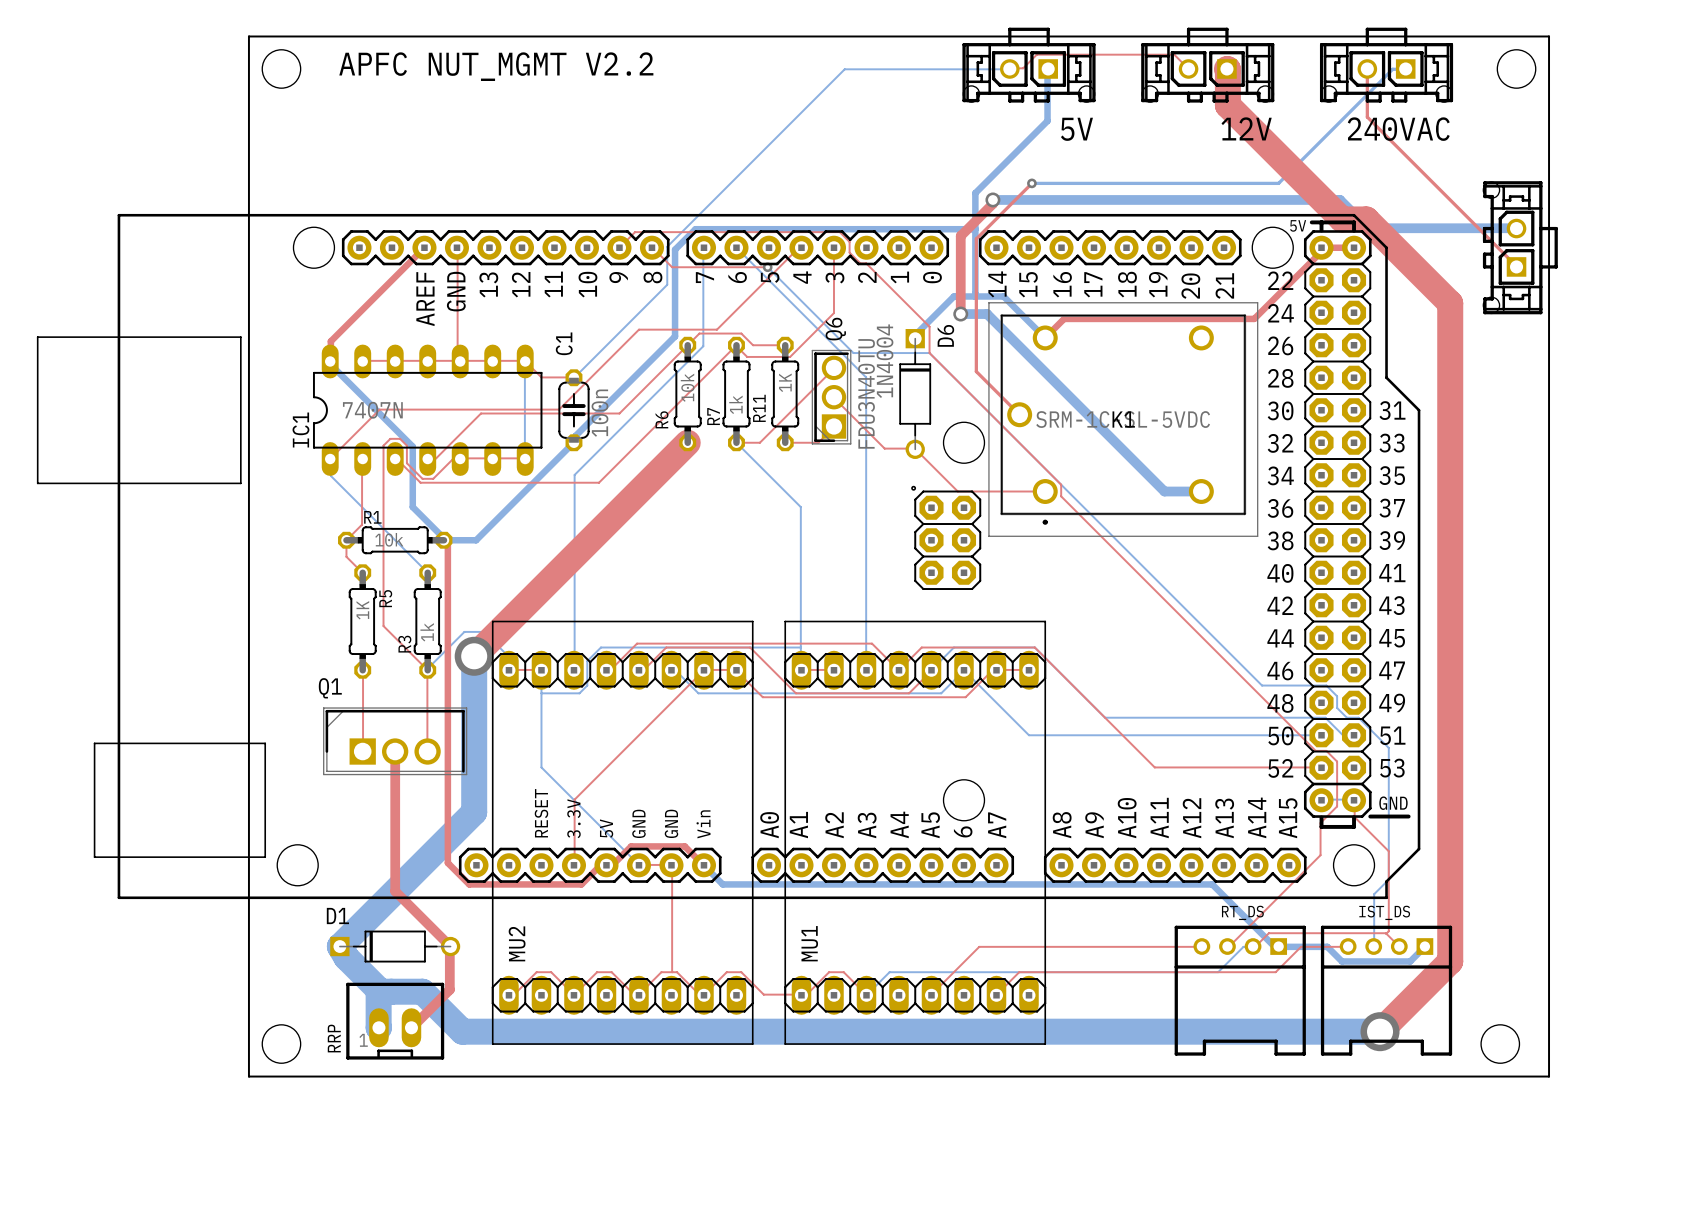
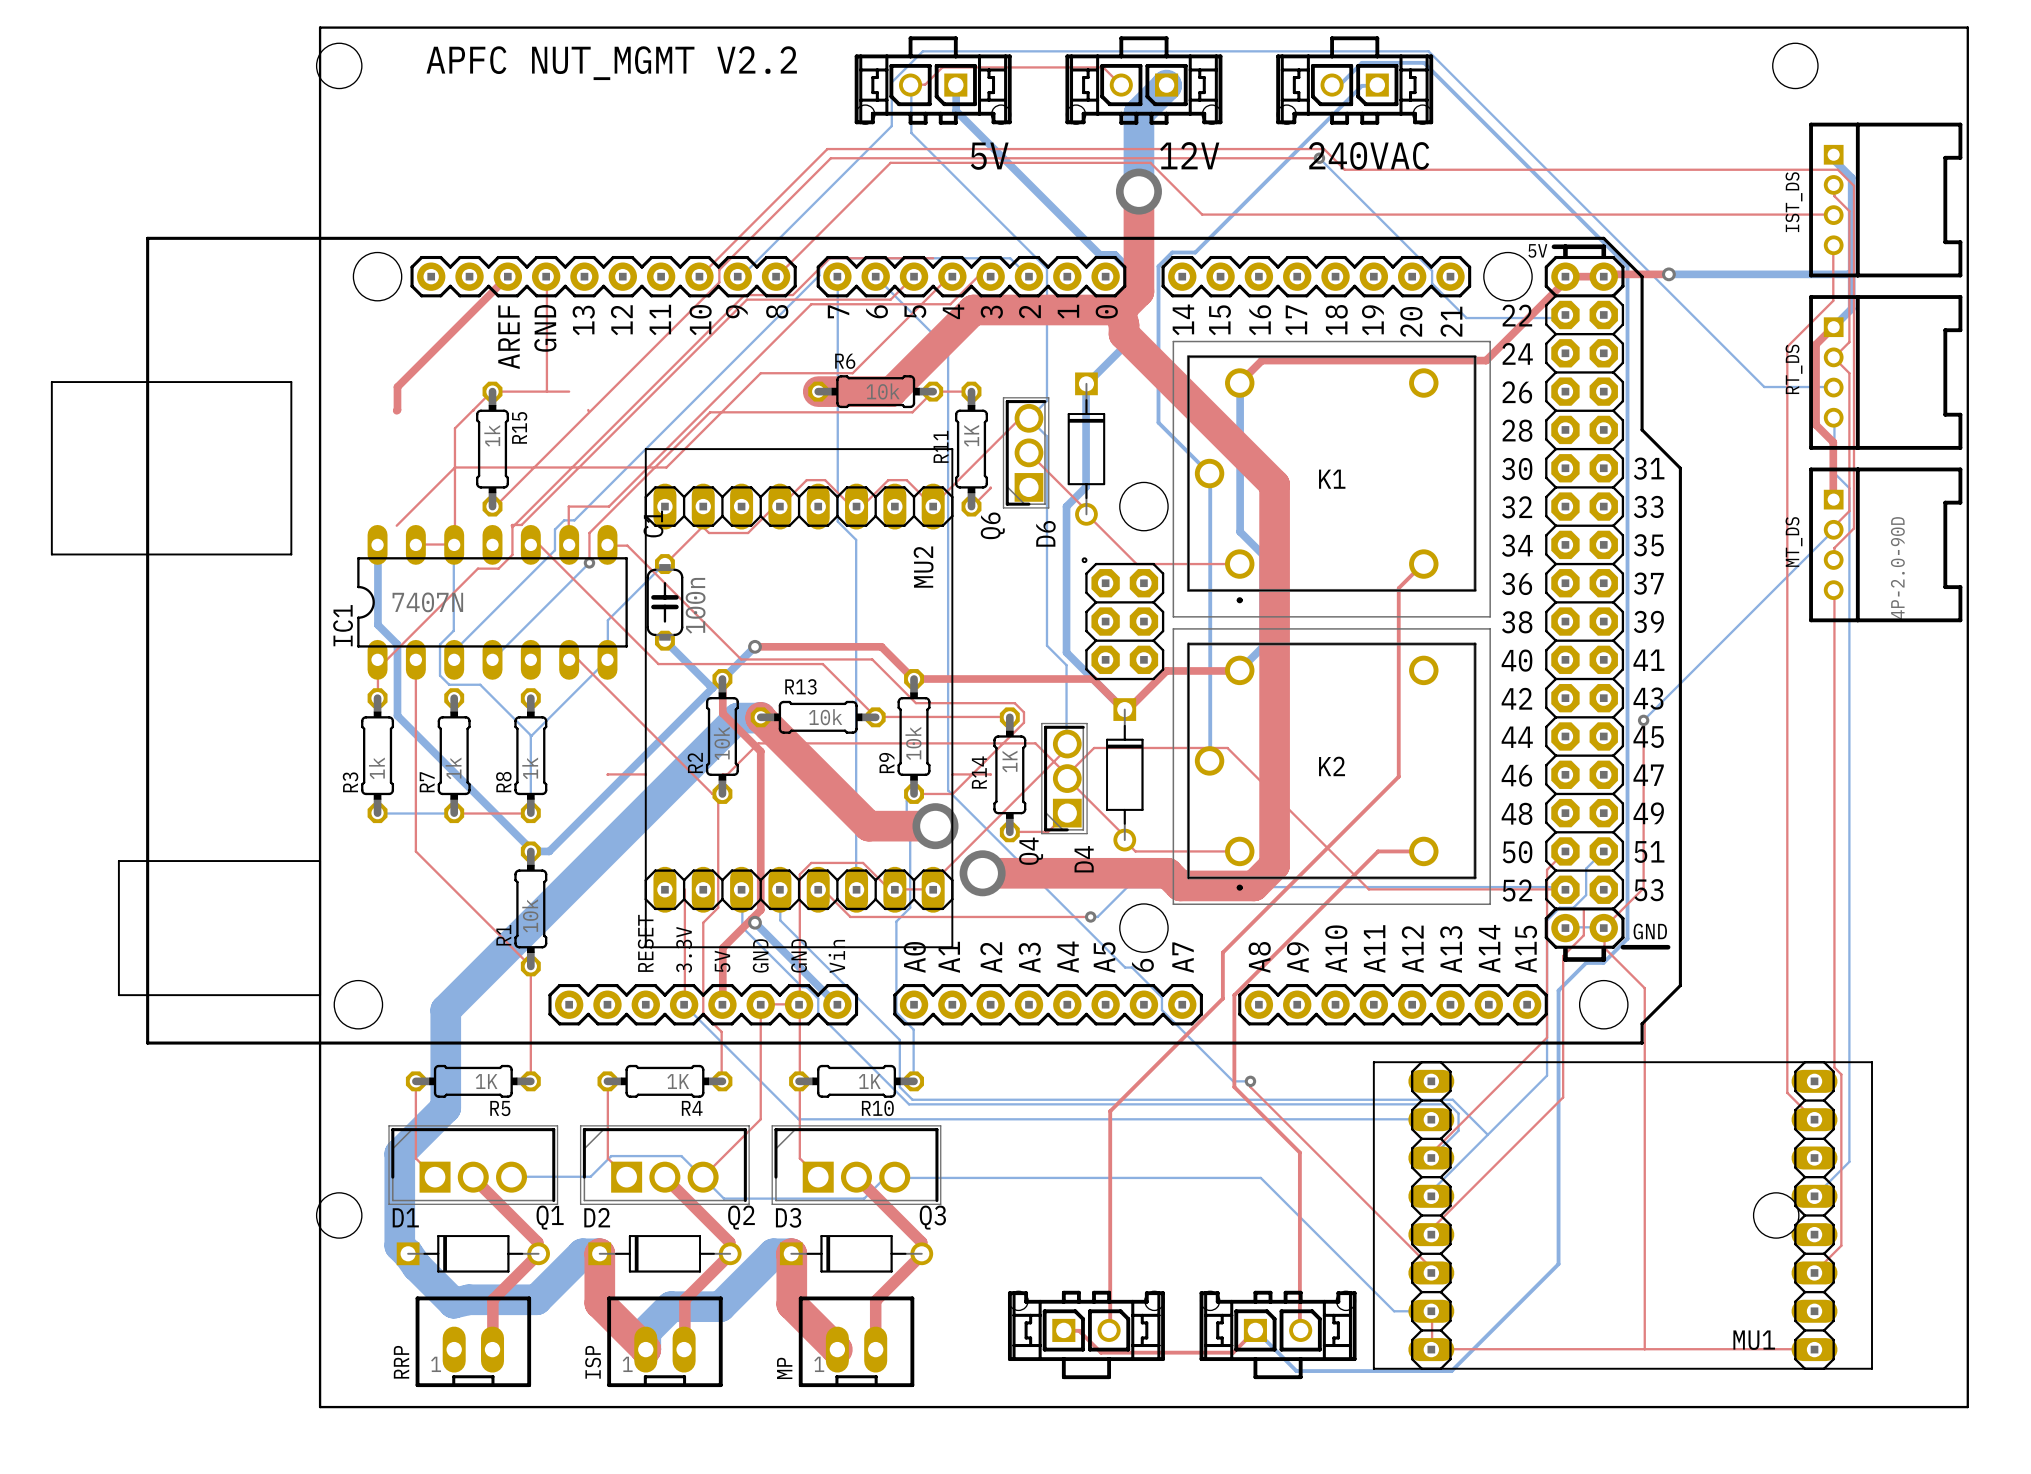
board edge: (265, 36) (248, 36) (248, 1076) (1549, 1076) (1549, 36) -> (320, 27) (320, 1407) (1967, 1407) (1967, 27) (1833, 27)
part: (1029, 65) -> none
part: (1207, 65) -> none
part: (1386, 65) -> none
text position: APFC NUT_MGMT V2.2 (496, 66) -> APFC NUT_MGMT V2.2 (611, 63)
top track: (1009, 68) (1023, 68) (1036, 54) (1174, 54) (1188, 68) -> none
bottom track: (1009, 68) (844, 69) (667, 246) (667, 284) (573, 377) -> none
bottom track: (1048, 68) (1047, 120) (975, 193) (975, 296) -> none
top track: (1226, 68) (1227, 105) (1341, 219) (1366, 219) (1450, 303) (1450, 961) (1380, 1031) -> none
top track: (1367, 68) (1367, 117) (1516, 266) -> none
bottom track: (1405, 68) (1392, 69) (1278, 183) (1031, 183) -> none
part: none -> (933, 80)
part: none -> (1143, 80)
part: none -> (1354, 80)
top track: none -> (910, 85) (925, 84) (942, 67) (1103, 67) (1121, 85)
bottom track: none -> (910, 85) (911, 132) (1046, 268) (1046, 400) (1028, 418) (1046, 436) (1046, 645) (1066, 665) (1067, 744)
bottom track: none -> (1166, 85) (1138, 113) (1138, 191)
bottom track: none -> (1332, 85) (1340, 84) (1361, 62) (1424, 62) (1627, 266) (1627, 938) (1603, 962) (1586, 962) (1558, 990) (1558, 1264) (1451, 1371) (1296, 1371) (1255, 1330)
bottom track: none -> (1377, 85) (1361, 85) (1195, 252) (1172, 252) (1158, 266) (1158, 422) (1210, 474) (1209, 760)
text position: 12V (1246, 128) -> 12V (1189, 155)
text position: 5V (1076, 129) -> 5V (989, 156)
text position: 240VAC (1398, 129) -> 240VAC (1369, 155)
bottom track: none -> (1833, 154) (1834, 160) (1851, 177) (1851, 308) (1833, 327)
top track: none -> (1319, 158) (830, 158) (719, 269) (719, 282) (495, 506) (492, 506)
bottom track: none -> (1319, 158) (1432, 270) (1432, 283) (1466, 318) (1563, 318) (1565, 314)
via: none -> (1319, 158)
top track: none -> (1833, 184) (1834, 196) (1849, 211) (1849, 342) (1833, 357) (1849, 373) (1849, 511) (1834, 526) (1833, 529)
top track: none -> (1138, 191) (1138, 291) (1120, 309)
via: none -> (1138, 191)
IST_DS: none -> (1885, 200)
top track: (1031, 183) (976, 238) (976, 371) (1019, 414) -> none
via: (1031, 183) -> none
top track: (992, 199) (992, 203) (960, 236) (960, 314) -> none
bottom track: (992, 199) (1340, 199) (1368, 228) (1516, 228) -> none
via: (992, 199) -> none
top track: none -> (1833, 245) (1833, 300) (1787, 346) (1787, 1092) (1814, 1119)
bottom track: (926, 229) (695, 229) (675, 249) (675, 336) (575, 435) (573, 442) (476, 540) (443, 540) (412, 507) (412, 446) (330, 364) (330, 361) -> (1099, 254) (956, 111) (955, 85)
bottom track: (939, 229) (975, 229) -> (1114, 254) (1127, 267) (1127, 343) (1086, 384) (1086, 487) (1066, 506) (1066, 652) (1124, 709)
top track: (697, 232) (635, 232) (619, 247) -> (829, 258) (792, 295) (744, 295) (512, 527) (512, 554) (498, 568) (477, 568) (385, 660) (377, 659) (377, 698)
top track: (785, 232) (839, 232) (849, 241) (849, 252) (860, 263) (866, 263) (929, 326) (929, 353) (1061, 484) (1061, 496) (1315, 750) (1326, 750) (1337, 761) (1337, 784) -> none
top track: none -> (1668, 274) (1606, 274) (1603, 276)
bottom track: none -> (1668, 274) (1851, 274)
via: none -> (1668, 274)
top track: none -> (699, 276) (827, 149) (1324, 149) (1344, 169) (1837, 169) (1853, 185) (1853, 528) (1834, 547) (1833, 559)
bottom track: none -> (737, 276) (741, 276) (891, 126) (891, 82) (922, 51) (1428, 51) (1764, 387) (1833, 387)
top track: (652, 247) (672, 267) -> (776, 276) (890, 162) (1150, 162) (1202, 214) (1833, 215)
bottom track: (703, 247) (703, 346) (574, 474) (573, 670) -> (837, 276) (837, 521) (856, 539) (856, 889)
top track: (833, 247) (833, 313) (790, 356) (747, 356) (736, 345) (599, 482) (420, 482) (395, 459) -> (990, 276) (978, 276) (950, 304) (811, 304) (609, 506) (568, 506) (569, 544)
bottom track: none -> (1028, 276) (1010, 258) (829, 258) (819, 268) (819, 275) (574, 520) (564, 520) (554, 529) (554, 550) (454, 650) (454, 659)
part: (1520, 247) -> none
top track: (749, 267) (767, 267) -> (890, 299) (914, 276)
bottom track: (767, 267) (853, 353) (929, 353) (1262, 685) (1326, 685) (1337, 696) (1337, 707) (1346, 717) (1358, 717) (1388, 747) (1388, 879) (1374, 894) (1373, 946) -> none
via: (767, 267) -> none
top track: none -> (1120, 309) (973, 309) (891, 391) (818, 391)
top track: none -> (1120, 309) (1124, 334) (1274, 484) (1274, 865) (1253, 885) (1180, 885) (1167, 873) (982, 873)
top track: none -> (1833, 327) (1816, 344) (1816, 424) (1833, 442) (1833, 499)
bottom track: (797, 309) (866, 377) (866, 670) -> (948, 349) (948, 790) (1125, 967) (1132, 967) (1161, 997) (1161, 1010) (1233, 1081) (1250, 1081)
bottom track: (960, 314) (987, 314) (1164, 491) (1201, 491) -> none
via: (960, 314) -> none
RT_DS: none -> (1885, 372)
Q6 name position: Q6 (835, 329) -> Q6 (992, 525)
D6 name position: D6 (945, 335) -> D6 (1045, 533)
bottom track: (1045, 337) (1003, 296) (953, 296) (915, 334) (915, 338) -> (1239, 383) (1240, 531) (1263, 554) (1263, 646) (1239, 670)
top track: none -> (569, 391) (491, 391) (454, 428) (454, 544) (415, 544)
top track: (785, 345) (753, 345) (741, 333) (699, 333) (619, 413) (481, 413) -> (799, 299) (746, 299) (574, 472)
top track: none -> (971, 391) (933, 391) (912, 412) (710, 412) (589, 533) (589, 562)
top track: (362, 361) (460, 361) -> none
top track: (460, 361) (524, 360) (541, 377) (573, 377) -> none
bottom track: (525, 361) (525, 459) -> none
D6 value: 1N4004 (884, 361) -> none
top track: (833, 367) (759, 442) (736, 442) -> none
top track: none -> (1028, 418) (1019, 419) (933, 506) (906, 480) (888, 480) (861, 506) (851, 506) (825, 480) (806, 480) (780, 506) (774, 506) (748, 533) (709, 533) (703, 527) (703, 506)
bottom track: none -> (1833, 417) (1834, 473) (1849, 488) (1849, 1161) (1814, 1196)
Q6 value: FDU3N40TU (866, 393) -> none
R15: none -> 1k (492, 449)
R6 rotation: 0° (687, 394) -> 90° clockwise (875, 391)
R6 position: (687, 394) -> (875, 391)
R7 position: (736, 394) -> (454, 755)
R11 position: (785, 394) -> (971, 449)
Q6 position: (831, 397) -> (1026, 452)
top track: (833, 397) (884, 448) (914, 448) -> (1028, 452) (1086, 510) (1086, 513)
R11 name position: R11 (759, 408) -> R11 (941, 446)
IC1 position: (427, 410) -> (492, 602)
C1 position: (573, 410) -> (664, 602)
K1 value: SRM-1C-SL-5VDC (1123, 419) -> none
top track: (687, 442) (474, 656) -> none
bottom track: (736, 442) (800, 507) (801, 670) -> none
top track: (785, 442) (817, 442) -> none
bottom track: (330, 459) (330, 475) (427, 572) -> none
top track: (362, 459) (362, 524) (346, 540) (346, 556) (362, 572) -> none
top track: (525, 459) (452, 459) (433, 478) (422, 478) (406, 463) (406, 445) (400, 438) (390, 438) (383, 445) (383, 626) (427, 670) (427, 751) -> none
top track: none -> (703, 526) (664, 564)
bottom track: none -> (1833, 529) (1643, 720)
bottom track: none -> (377, 544) (377, 624) (397, 644) (397, 715) (529, 847) (530, 851) (549, 851) (755, 646)
bottom track: none -> (454, 544) (453, 630) (440, 644) (440, 675) (449, 684) (480, 684) (531, 735)
top track: none -> (530, 544) (540, 545) (658, 664) (822, 664) (875, 716)
top track: none -> (607, 544) (627, 545) (741, 659) (872, 659) (915, 703) (1014, 703) (1024, 712) (1024, 722) (952, 793) (914, 793)
MT_DS: none -> 4P-2.0-90D (1885, 544)
bottom track: none -> (589, 562) (492, 659)
via: none -> (589, 562)
bottom track: none -> (664, 564) (607, 620) (607, 659) (530, 736) (530, 813)
top track: none -> (1423, 564) (1398, 588) (1398, 776) (1222, 952) (1222, 998) (1110, 1111) (1109, 1330)
top track: none -> (1833, 590) (1834, 1067) (1841, 1074) (1841, 1245) (1814, 1272)
R1 name position: R1 (372, 517) -> R1 (503, 935)
R1 rotation: 0° (395, 540) -> 90° clockwise (530, 908)
R1 position: (395, 540) -> (530, 908)
top track: (443, 540) (447, 544) (447, 863) (469, 884) (581, 884) (599, 866) (606, 865) -> (722, 679) (722, 713) (760, 751) (760, 910) (722, 948) (722, 1004)
bottom track: none -> (664, 640) (712, 688)
top track: none -> (755, 646) (881, 646) (914, 679) (1092, 679) (1124, 710) (1128, 708) (1166, 670) (1239, 670)
via: none -> (755, 646)
top track: none -> (415, 659) (415, 851) (530, 966) (530, 1081)
top track: none -> (569, 659) (579, 660) (712, 793) (722, 793)
R5 rotation: 0° (362, 621) -> 90° clockwise (473, 1081)
R5 position: (362, 621) -> (473, 1081)
R3 position: (427, 621) -> (377, 755)
top track: none -> (760, 717) (868, 826) (935, 826)
bottom track: none -> (760, 717) (737, 718) (445, 1010) (445, 1107) (399, 1153) (399, 1245) (407, 1253)
R13: none -> 10k (818, 717)
top track: none -> (875, 716) (1009, 717)
top track: none -> (1643, 720) (1643, 888) (1603, 928)
via: none -> (1643, 720)
R2: none -> 10k (722, 736)
R9: none -> 10k (914, 736)
top track: none -> (1067, 744) (1066, 749) (933, 882) (933, 889)
bottom track: (800, 647) (600, 647) (587, 661) (587, 685) (579, 693) (541, 693) -> none
R8: none -> 1k (530, 755)
bottom track: (474, 656) (474, 812) (339, 946) (346, 957) (378, 989) (378, 1027) -> none
via: (474, 656) -> none
K2: none -> (1331, 766)
top track: (638, 669) (643, 669) (666, 647) (750, 647) (795, 693) (909, 693) (931, 670) -> none
top track: (362, 670) (362, 751) -> none
bottom track: (427, 670) (464, 631) (483, 631) (508, 656) (508, 670) -> none
bottom track: (541, 670) (541, 767) (638, 865) -> none
bottom track: (671, 670) (676, 670) (698, 693) (941, 693) (964, 670) (1029, 735) (1321, 735) -> none
R14: none -> 1K (1009, 774)
bottom track: (931, 670) (953, 647) (1034, 647) (1105, 717) (1325, 717) (1342, 735) (1353, 735) -> (1431, 1196) (1432, 1190) (1547, 1075) (1547, 920) (1559, 907) (1573, 907) (1586, 895) (1586, 868) (1603, 851)
D4: none -> (1124, 774)
top track: (1029, 670) (991, 670) (965, 697) (762, 697) (736, 669) (704, 669) (574, 799) -> (684, 889) (684, 927)
Q4: none -> (1064, 778)
top track: none -> (1067, 778) (1124, 835) (1124, 839) (1135, 851) (1239, 851)
top track: none -> (718, 793) (718, 907) (703, 922) (703, 1013) (721, 1031) (722, 1081)
bottom track: none -> (914, 793) (906, 800) (906, 837) (910, 841) (910, 907) (896, 921) (896, 1012) (913, 1029) (914, 1081)
Q1 name position: Q1 (330, 688) -> Q1 (550, 1217)
bottom track: none -> (377, 813) (454, 813)
top track: none -> (454, 813) (530, 813)
top track: none -> (1067, 813) (1048, 831) (1009, 832)
via: none -> (935, 826)
top track: none -> (1423, 851) (1378, 851) (1234, 995) (1234, 1087) (1299, 1152) (1300, 1330)
top track: none -> (1565, 851) (1547, 869) (1547, 1037) (1432, 1152) (1431, 1158)
Q1 position: (395, 741) -> (473, 1165)
top track: (395, 751) (395, 891) (450, 946) (449, 989) (411, 1027) -> none
via: none -> (982, 873)
bottom track: none -> (741, 889) (742, 927) (802, 987) (806, 987) (818, 998) (818, 1013) (909, 1104) (1449, 1104) (1458, 1113) (1458, 1130) (1431, 1158)
bottom track: none -> (779, 889) (780, 920) (899, 1039) (899, 1087) (912, 1099) (1452, 1099) (1487, 1134)
top track: none -> (818, 889) (823, 890) (850, 916) (1090, 916)
top track: none -> (933, 889) (889, 889) (863, 862) (811, 862) (799, 874) (799, 1004)
bottom track: none -> (1565, 889) (1563, 887) (1127, 887) (1097, 916) (1090, 916)
via: none -> (1090, 916)
via: none -> (755, 922)
top track: (1320, 823) (1320, 855) (1227, 946) -> (1564, 954) (1563, 1097) (1432, 1228) (1431, 1234)
MU2 position: (622, 832) -> (799, 698)
MU1 rotation: 0° (915, 832) -> 90° clockwise (1622, 1215)
MU1 position: (915, 832) -> (1622, 1215)
top track: (606, 864) (612, 864) (631, 846) (684, 846) (703, 865) -> none
bottom track: none -> (684, 1004) (798, 1119) (1431, 1119)
top track: none -> (760, 1004) (760, 1119) (703, 1177)
bottom track: (703, 865) (722, 884) (1212, 884) (1273, 945) (1327, 946) (1341, 961) (1410, 961) (1424, 946) -> (837, 1004) (755, 922)
top track: none -> (415, 1081) (415, 1158) (435, 1177)
top track: none -> (607, 1081) (607, 1158) (626, 1177)
R4: none -> 1K (664, 1081)
R10: none -> 1K (856, 1081)
top track: none -> (1250, 1081) (1250, 1087) (1430, 1267) (1431, 1272)
via: none -> (1250, 1081)
top track: (1388, 931) (1386, 933) -> (1644, 1082) (1644, 1349)
MU2 name position: MU2 (517, 943) -> MU2 (923, 567)
MU1 name position: MU1 (809, 943) -> MU1 (1754, 1340)
D1 position: (395, 946) -> (473, 1253)
top track: (1201, 946) (979, 946) (931, 995) -> none
top track: (1253, 946) (1256, 945) (1268, 933) (1385, 933) (1399, 946) -> none
bottom track: (1253, 946) (1243, 946) (1218, 972) (889, 972) (866, 995) -> none
top track: (1348, 946) (1301, 946) (1275, 972) (1019, 972) (996, 995) -> none
top track: none -> (799, 1130) (799, 1158) (818, 1177)
RT_DS: (1240, 990) -> none
IST_DS: (1386, 990) -> none
bottom track: (378, 991) (422, 991) (462, 1031) (1380, 1031) -> none
top track: (638, 994) (634, 994) (611, 972) (597, 972) (573, 995) (551, 972) (536, 972) (514, 994) (508, 995) -> none
top track: (638, 994) (661, 972) (677, 972) (699, 994) (703, 995) (726, 972) (741, 972) (763, 994) (801, 995) (806, 994) (829, 972) (843, 972) (866, 995) -> none
Q2: none -> (664, 1165)
Q3: none -> (856, 1165)
top track: none -> (473, 1177) (537, 1242) (538, 1253) (492, 1299) (492, 1349)
bottom track: none -> (511, 1177) (590, 1176) (611, 1156) (681, 1156) (723, 1198) (864, 1198) (884, 1177) (894, 1177) (1260, 1177) (1394, 1311) (1431, 1311)
top track: none -> (664, 1177) (729, 1242) (730, 1253) (684, 1299) (684, 1349)
top track: none -> (856, 1177) (921, 1242) (921, 1253)
RRP position: (395, 1021) -> (473, 1341)
via: (1380, 1031) -> none
bottom track: none -> (408, 1253) (417, 1266) (453, 1303) (468, 1299) (536, 1299) (582, 1253) (599, 1253)
top track: none -> (599, 1253) (599, 1303) (645, 1349)
D2: none -> (664, 1253)
top track: none -> (791, 1253) (791, 1304) (837, 1349)
bottom track: none -> (791, 1253) (773, 1253) (720, 1306) (671, 1306) (645, 1331) (645, 1349)
D3: none -> (856, 1253)
top track: none -> (921, 1253) (875, 1300) (875, 1349)
top track: none -> (1431, 1311) (1431, 1349) (1814, 1349)
top track: none -> (1063, 1330) (1079, 1330) (1101, 1352) (1233, 1352) (1255, 1330)
part: none -> (1086, 1334)
part: none -> (1278, 1334)
ISP: none -> (664, 1341)
MP: none -> (856, 1341)

